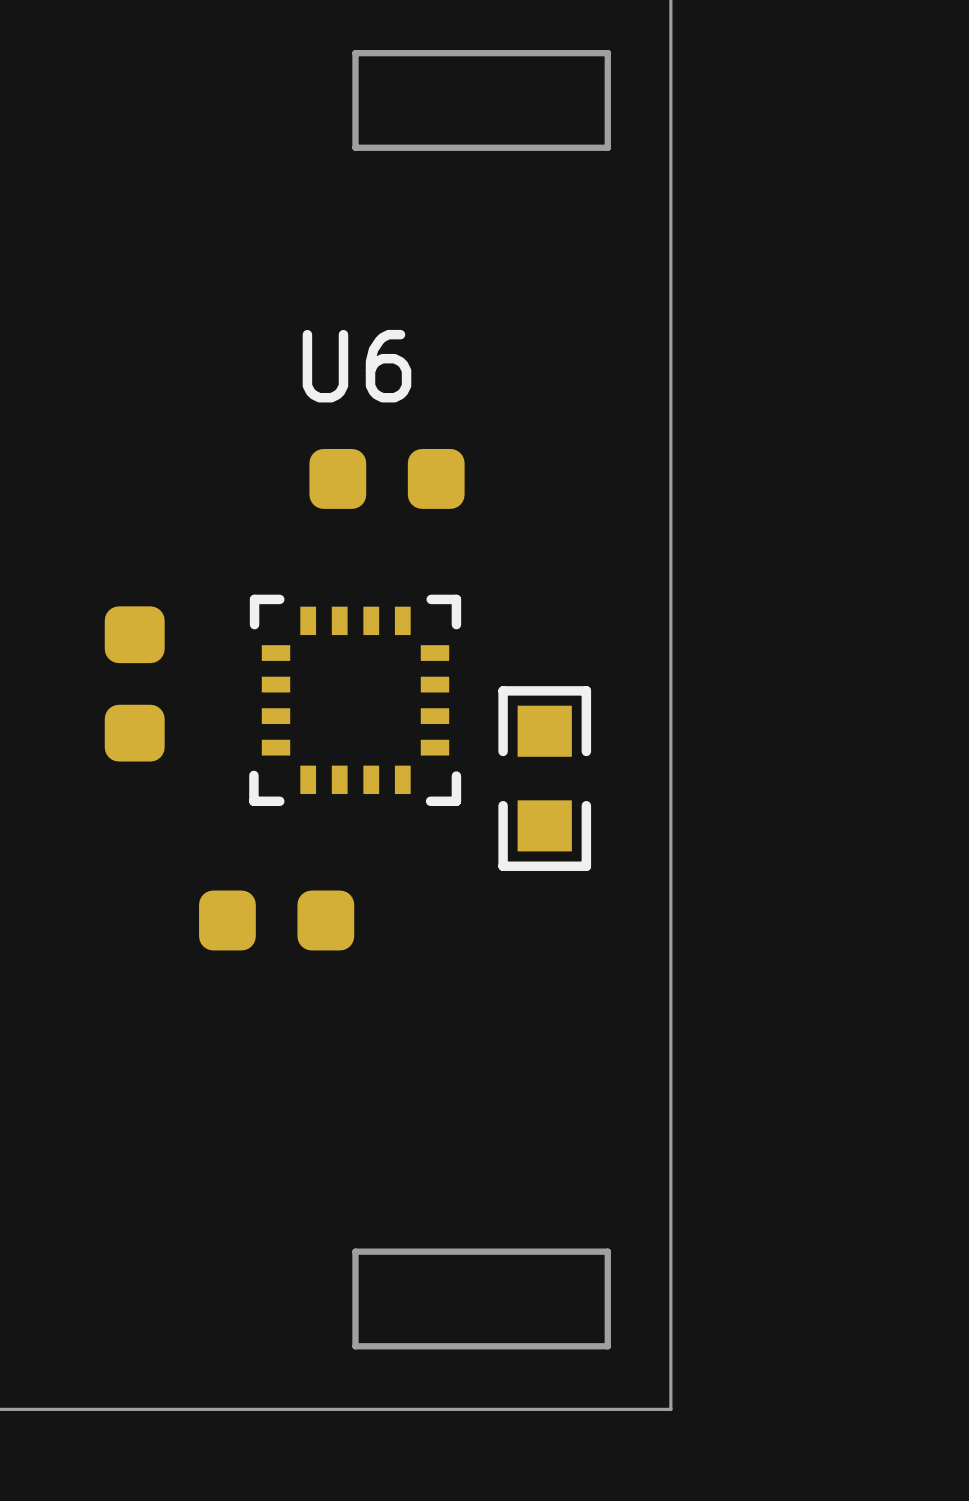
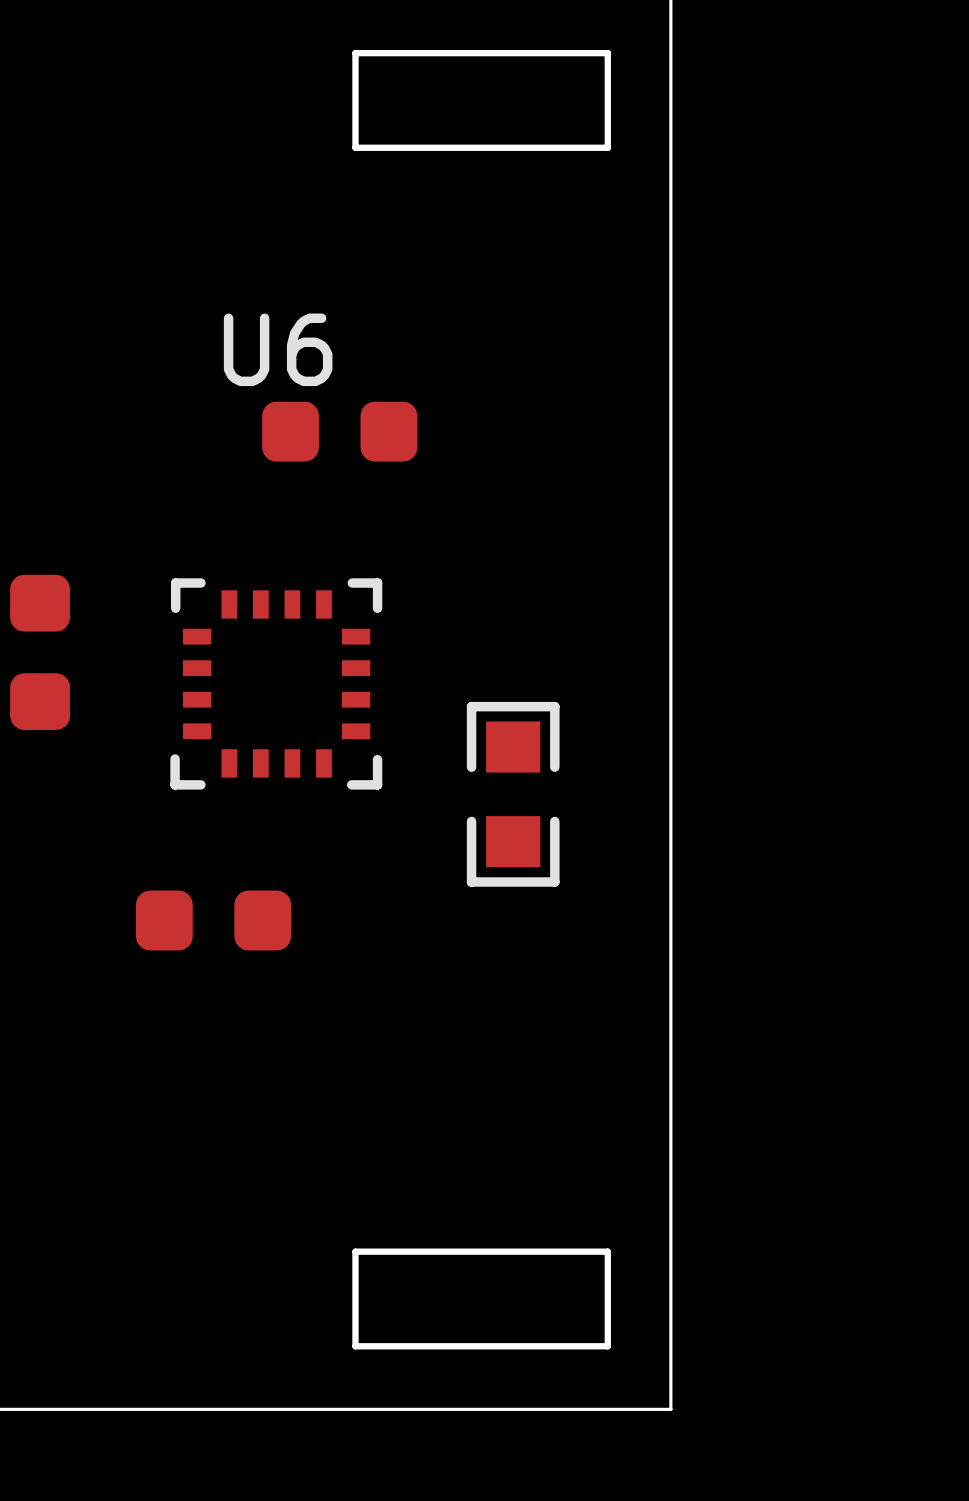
part position: (387, 478) -> (339, 431)
part: none -> (40, 652)
part: (134, 683) -> none
U6 position: (355, 700) -> (276, 683)
part position: (544, 778) -> (513, 794)
part position: (276, 920) -> (213, 920)

